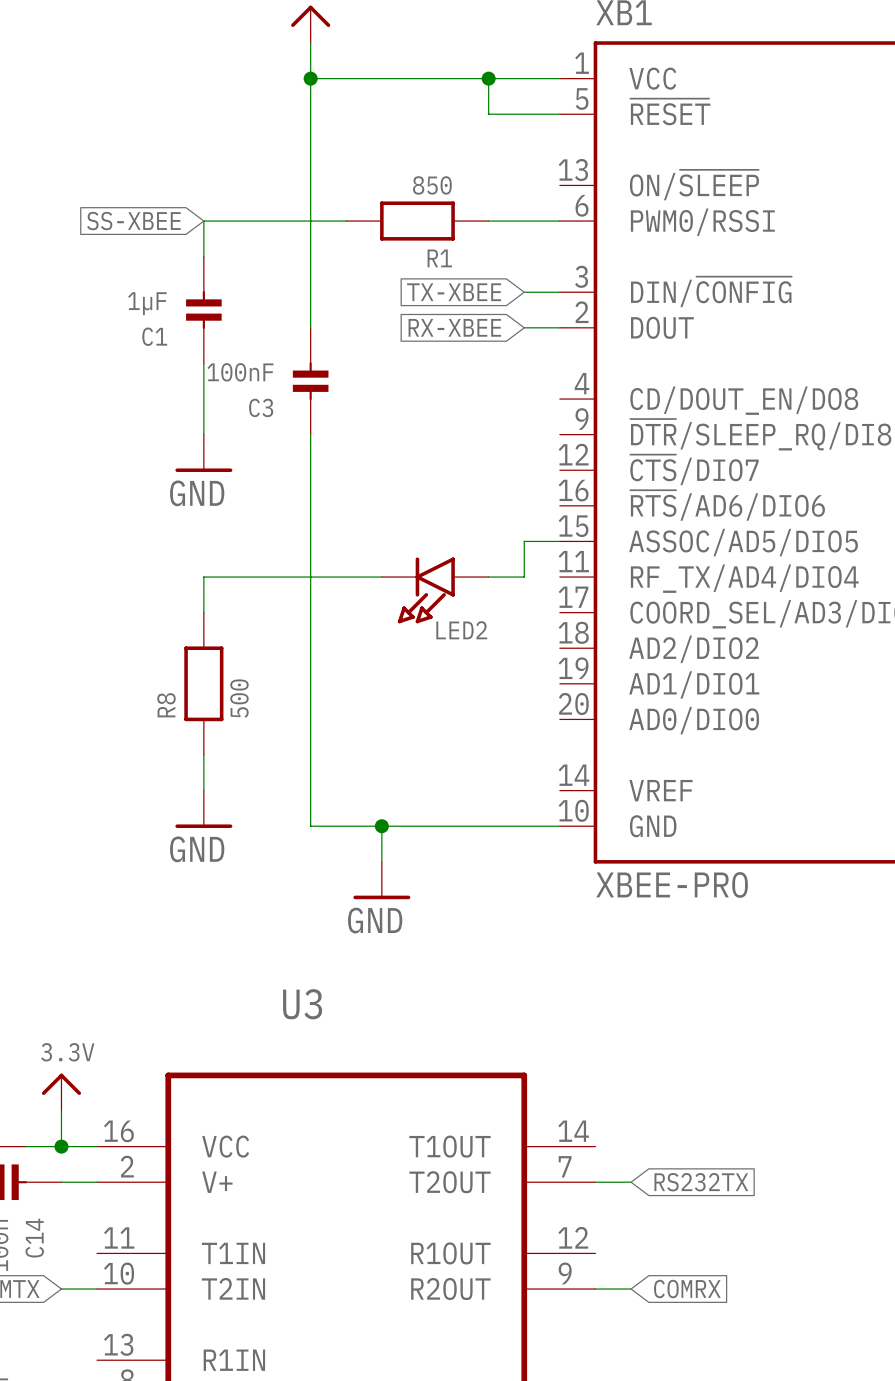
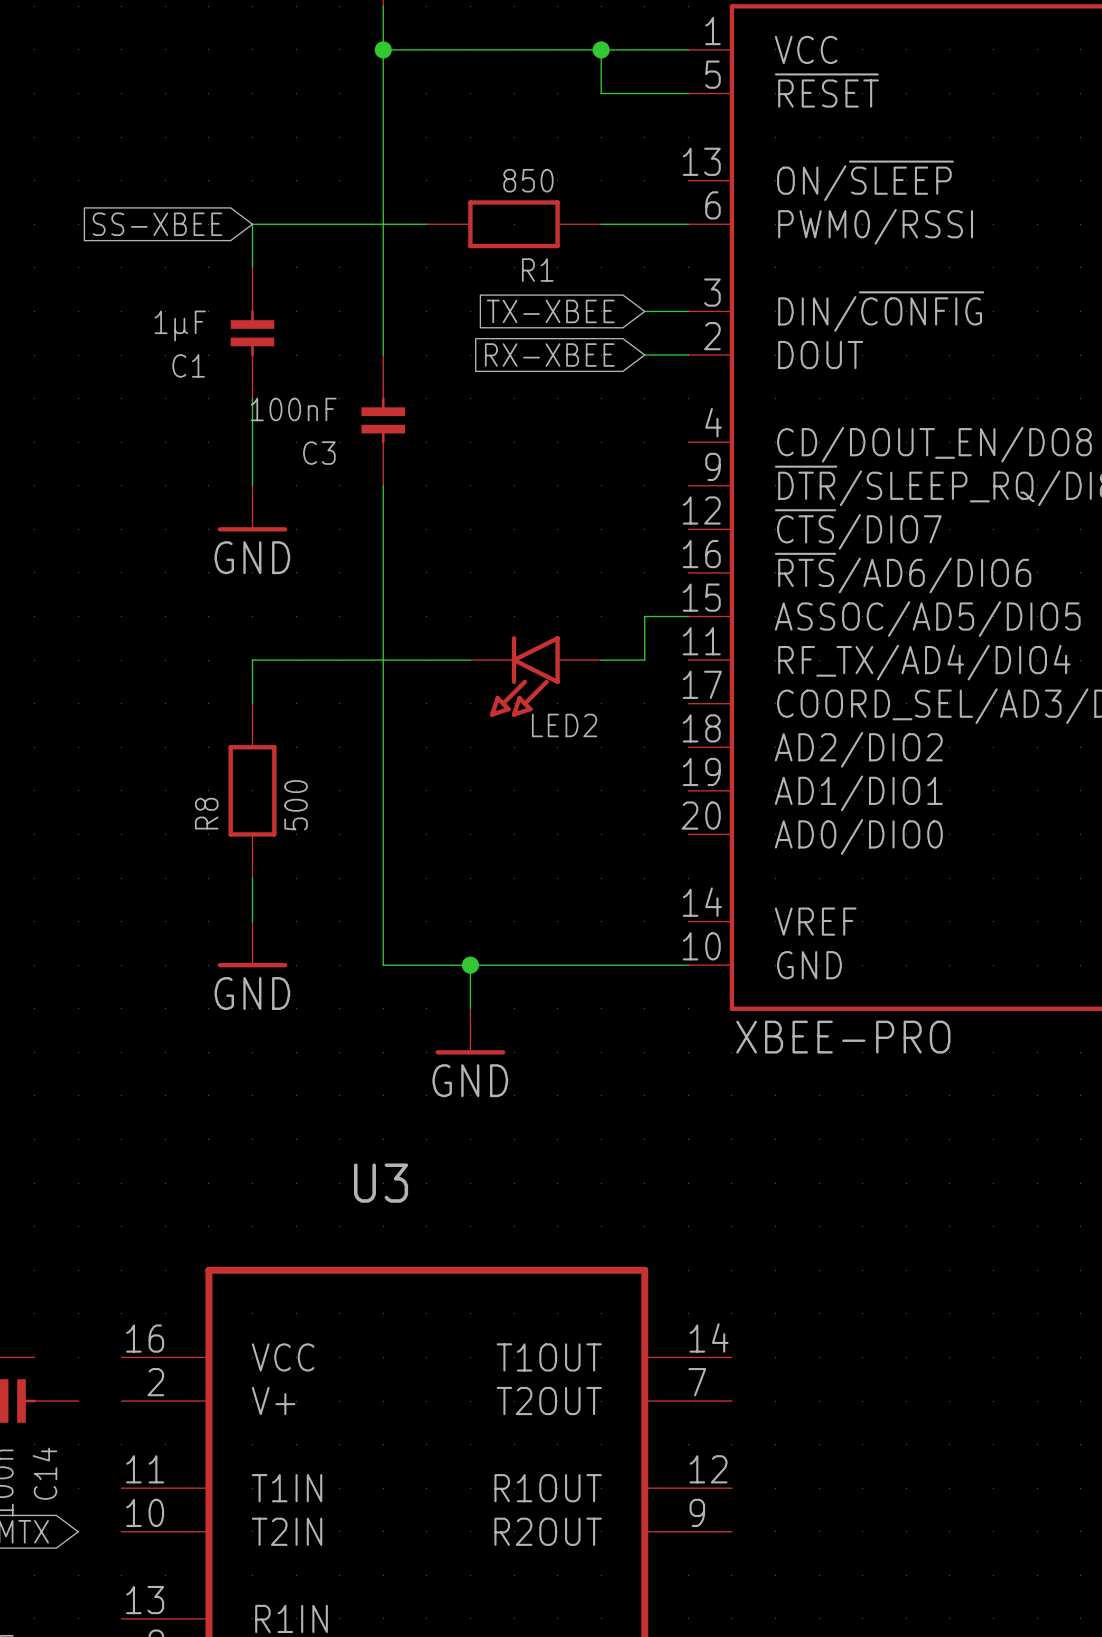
power symbol: 3.3V (61, 1092) -> none
wire: (61, 1111) (61, 1146) -> none
wire: (25, 1146) (97, 1146) -> none
junction: (61, 1146) -> none
wire: (61, 1182) (97, 1182) -> none
wire: (595, 1182) (631, 1182) -> none
global label: RS232TX (701, 1182) -> none
wire: (61, 1289) (97, 1289) -> none
wire: (595, 1289) (631, 1289) -> none
global label: COMRX (687, 1289) -> none

